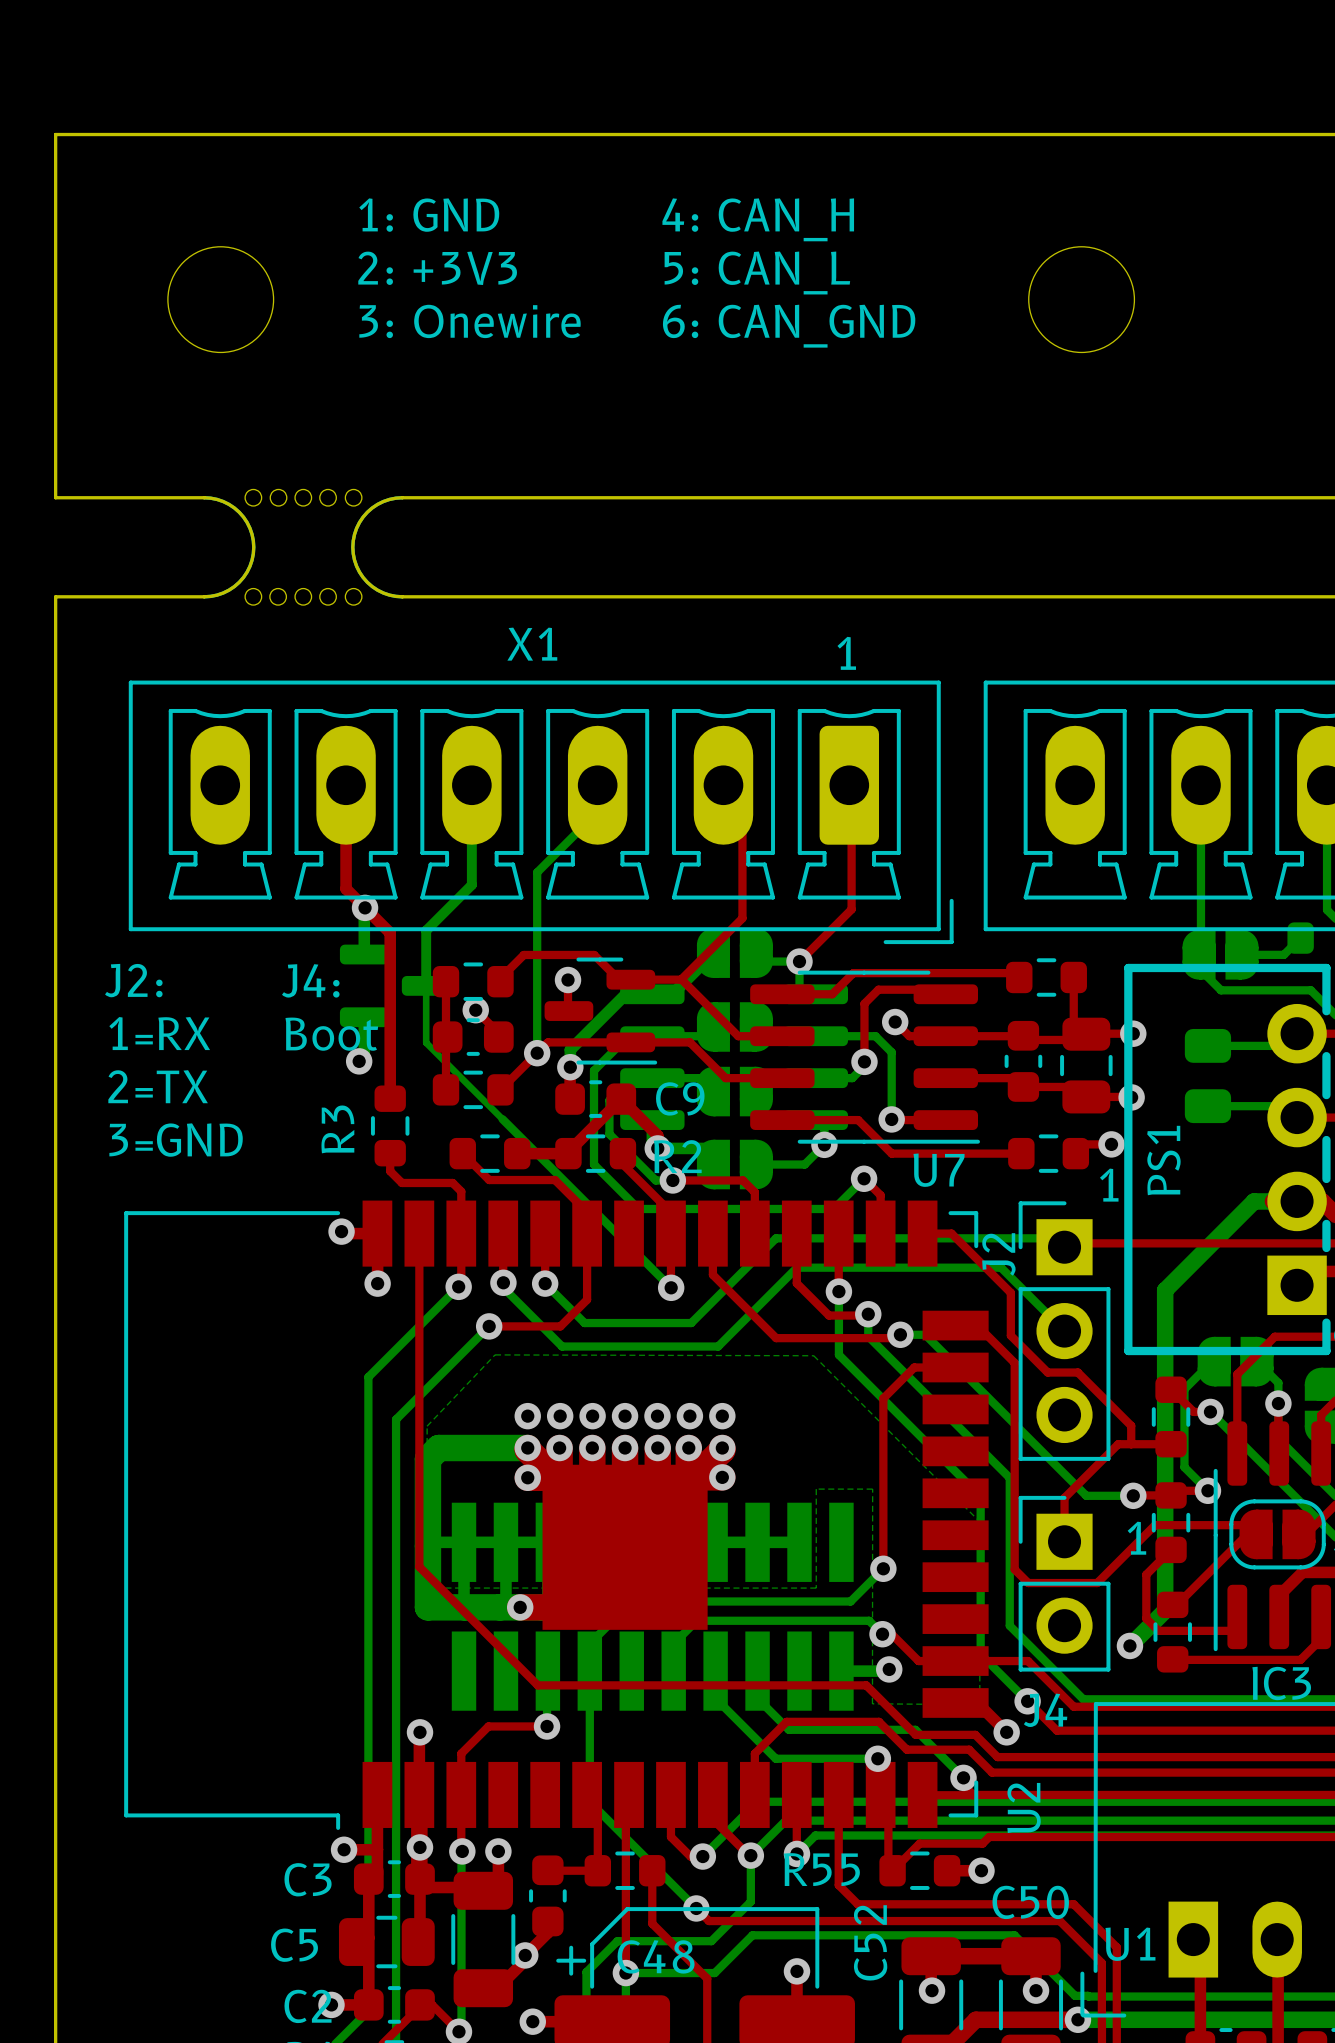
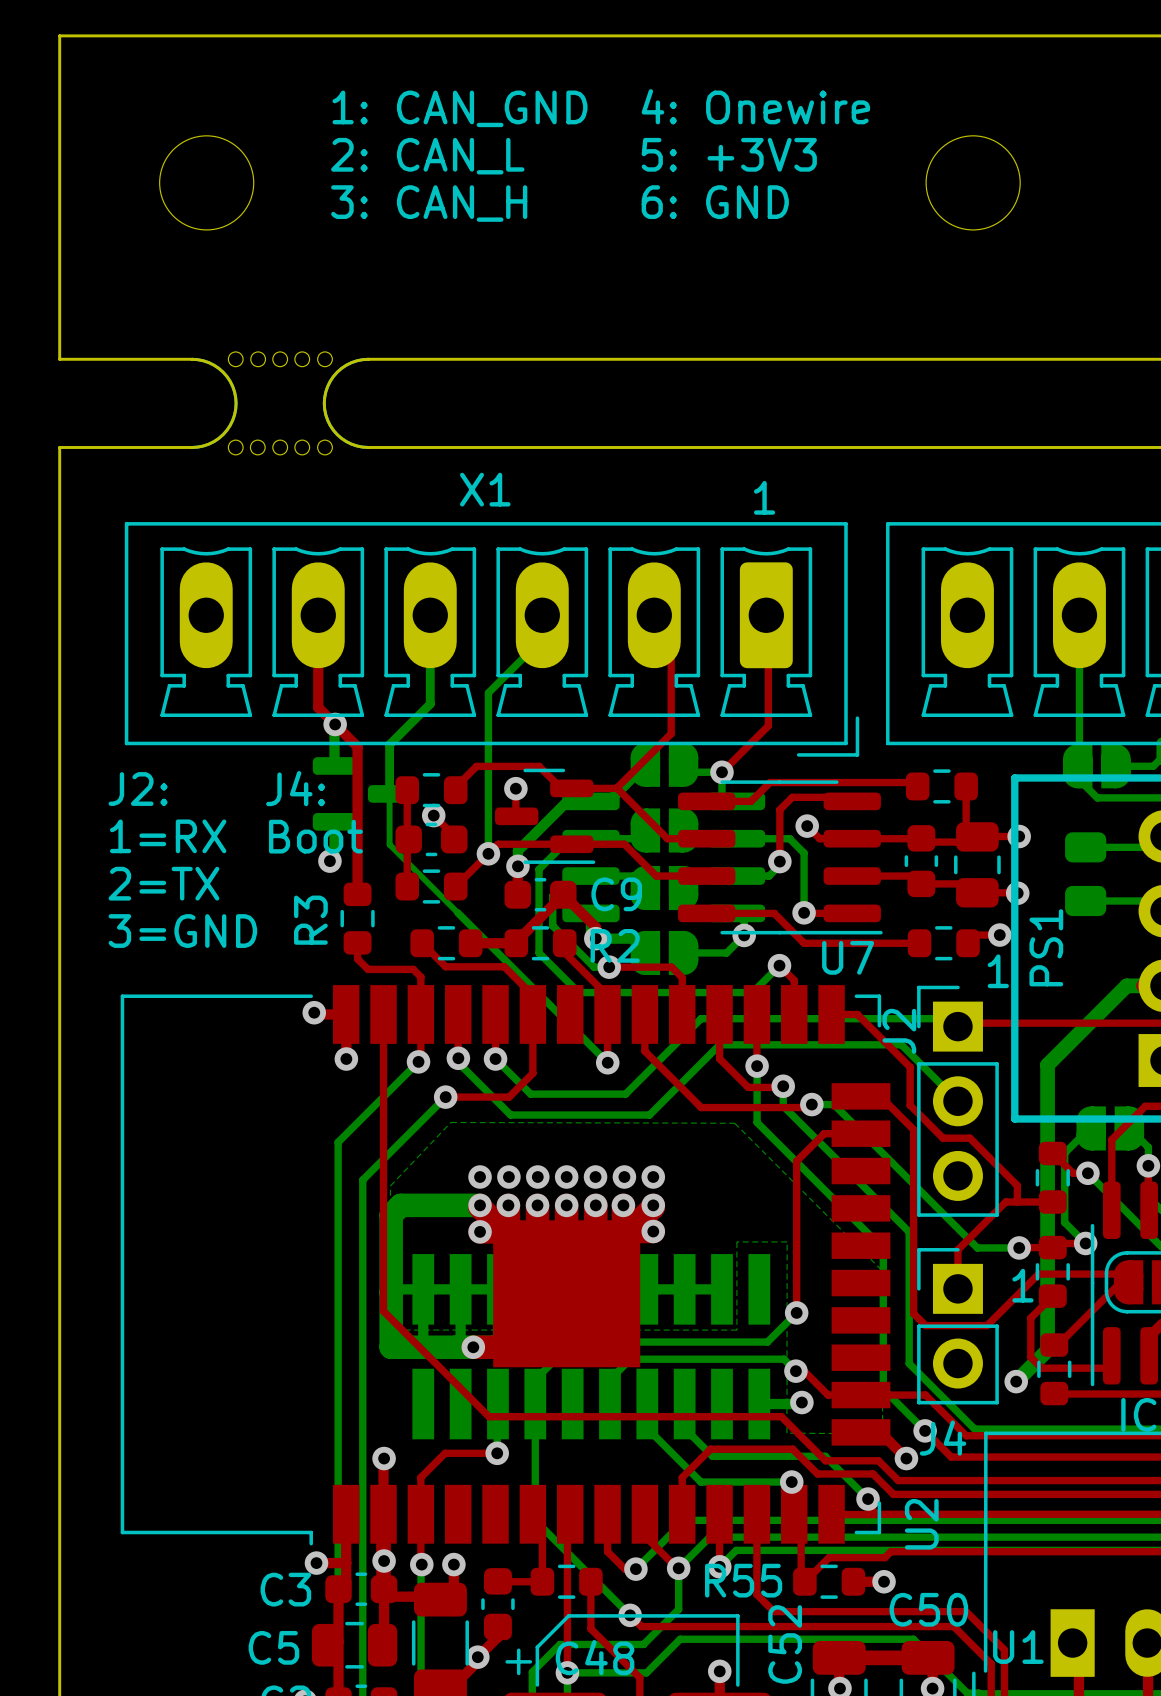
text: 1: GND (429, 215) -> 1: CAN_GND (460, 108)
text: none -> 4: Onewire (755, 106)
text: 4: CAN_H (758, 219) -> none
text: 2: +3V3 (437, 268) -> 2: CAN_L (427, 156)
text: none -> 5: +3V3 (729, 154)
text: 5: CAN_L (757, 273) -> none
text: 3: Onewire (470, 321) -> 3: CAN_H (429, 203)
text: 6: CAN_GND (789, 326) -> 6: GND (715, 202)

